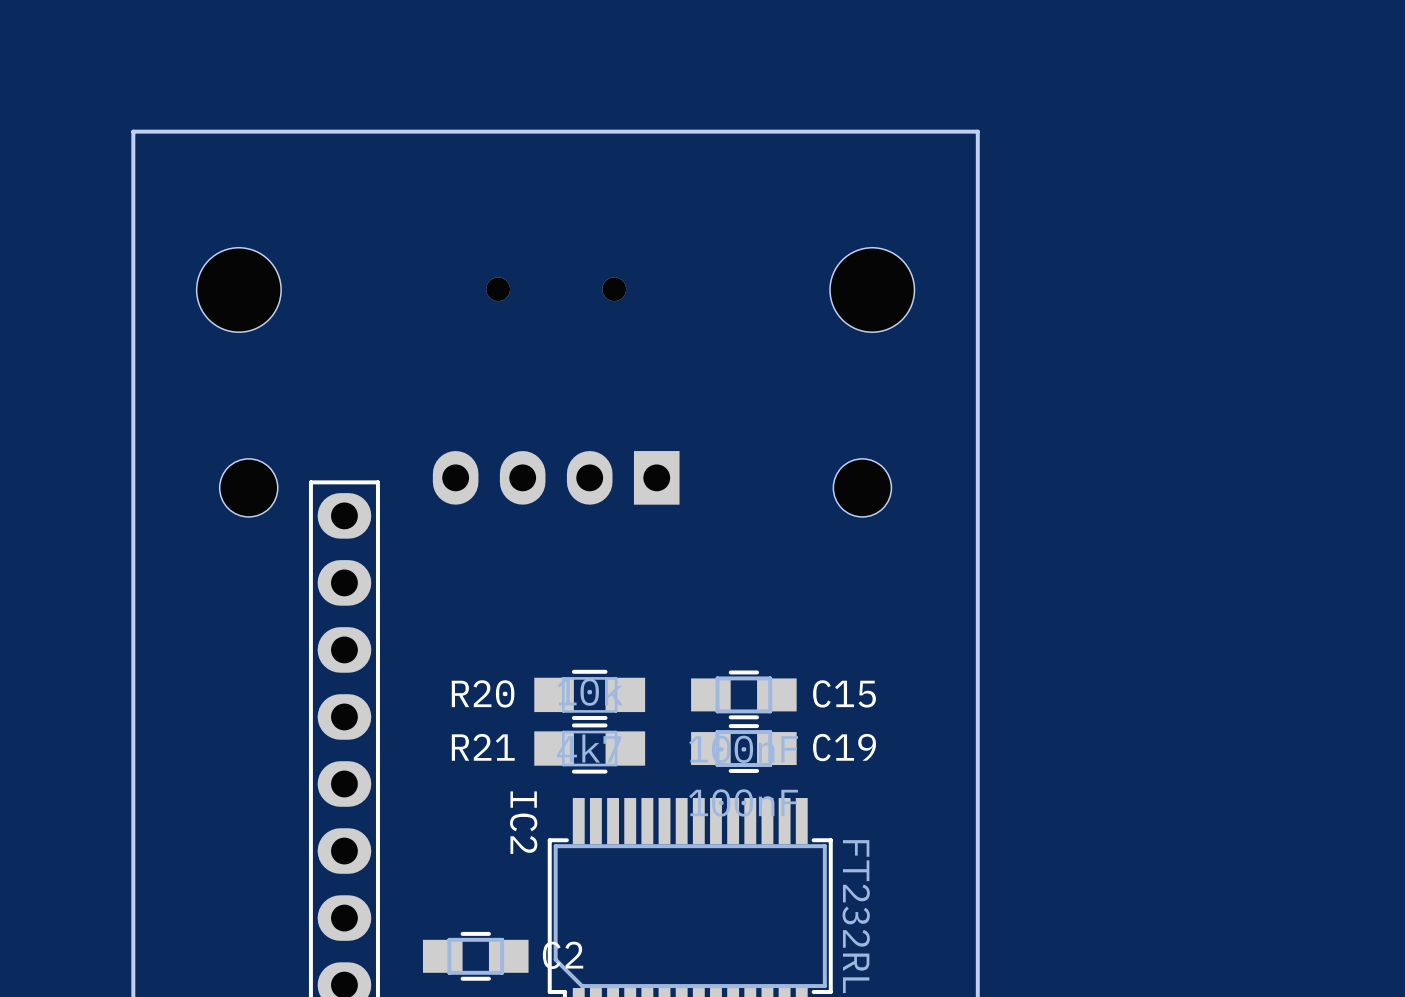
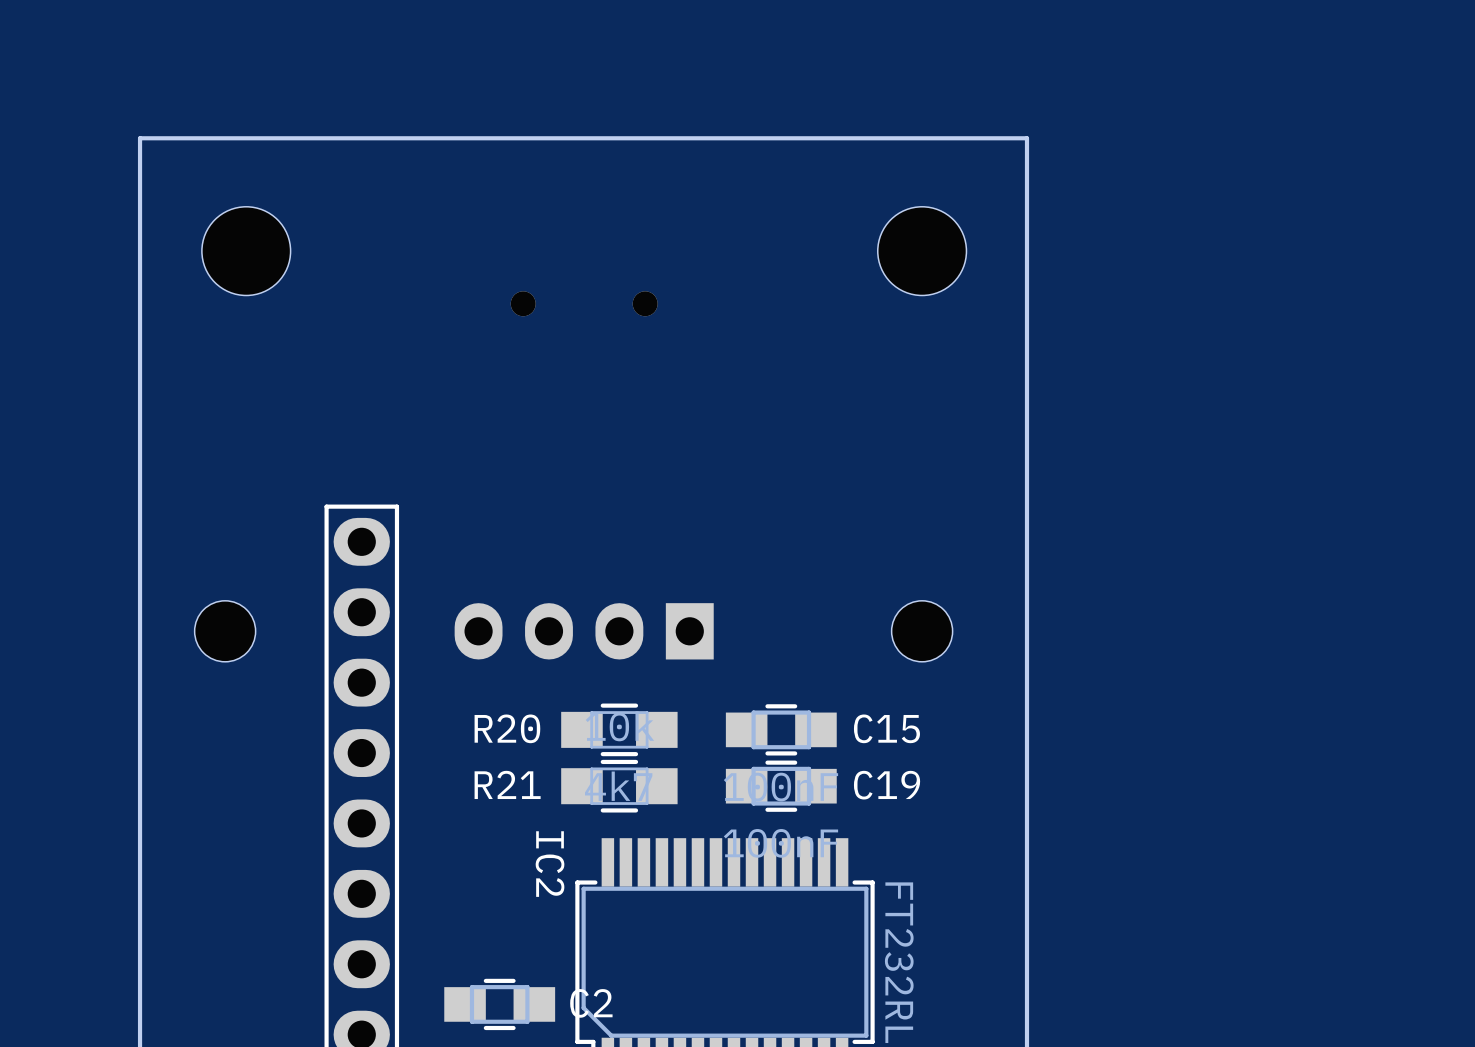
part position: (238, 289) -> (246, 251)
part position: (872, 289) -> (922, 251)
part position: (556, 477) -> (584, 631)
part position: (248, 487) -> (225, 631)
part position: (862, 487) -> (922, 631)

